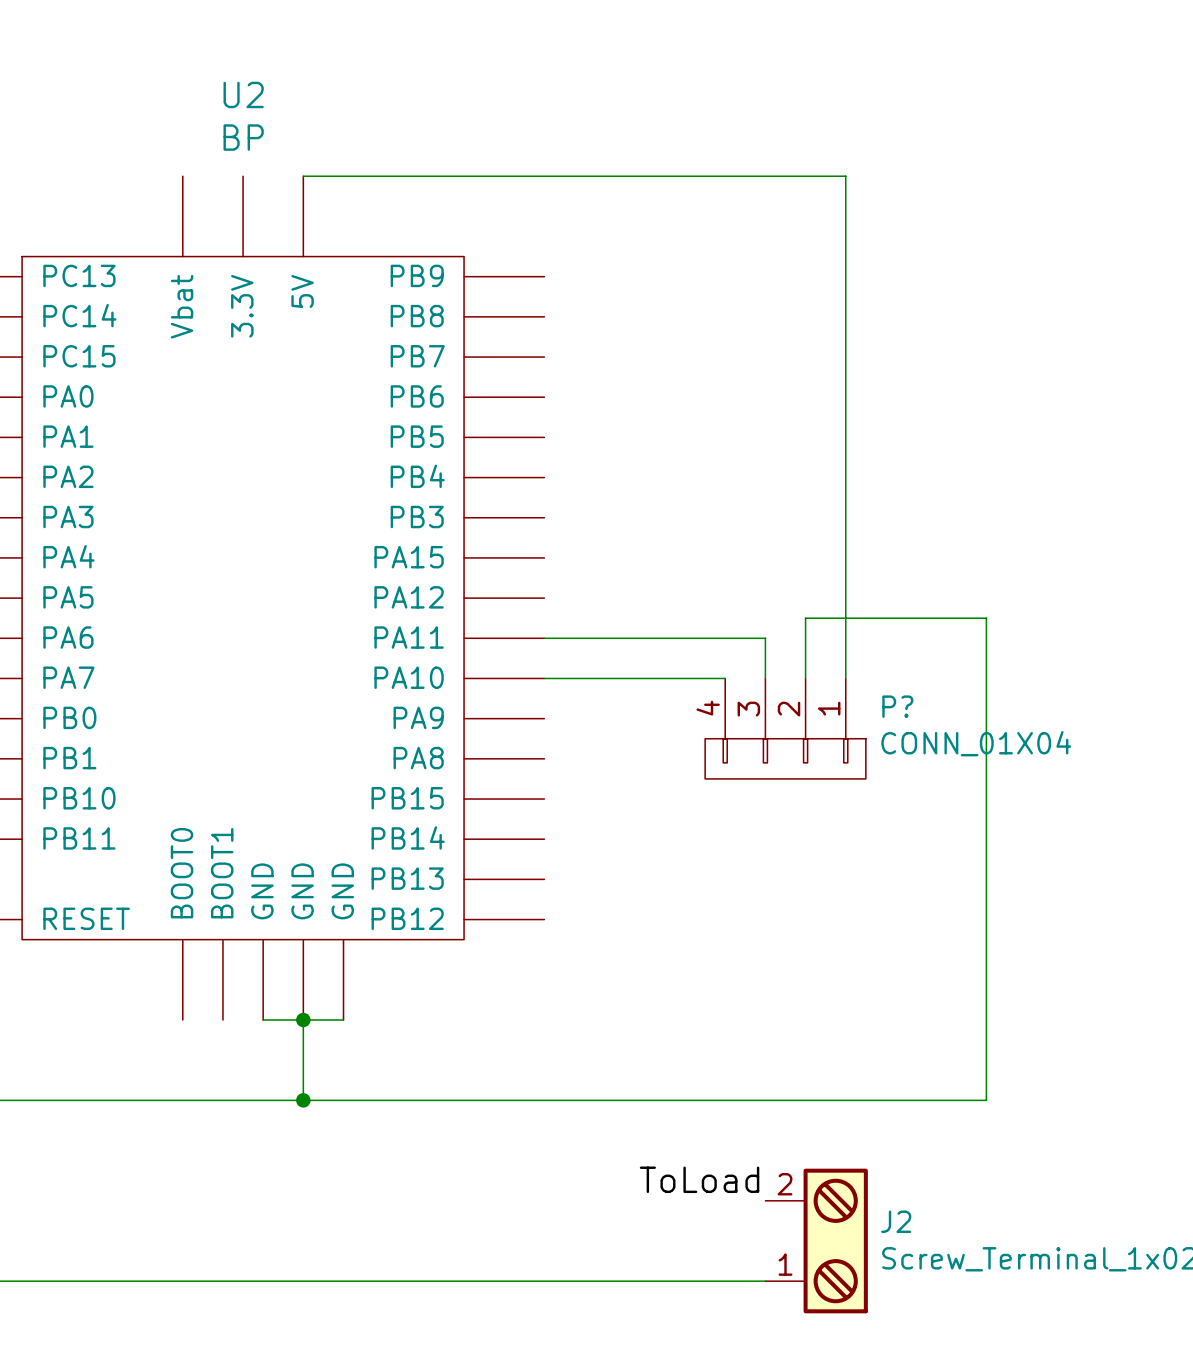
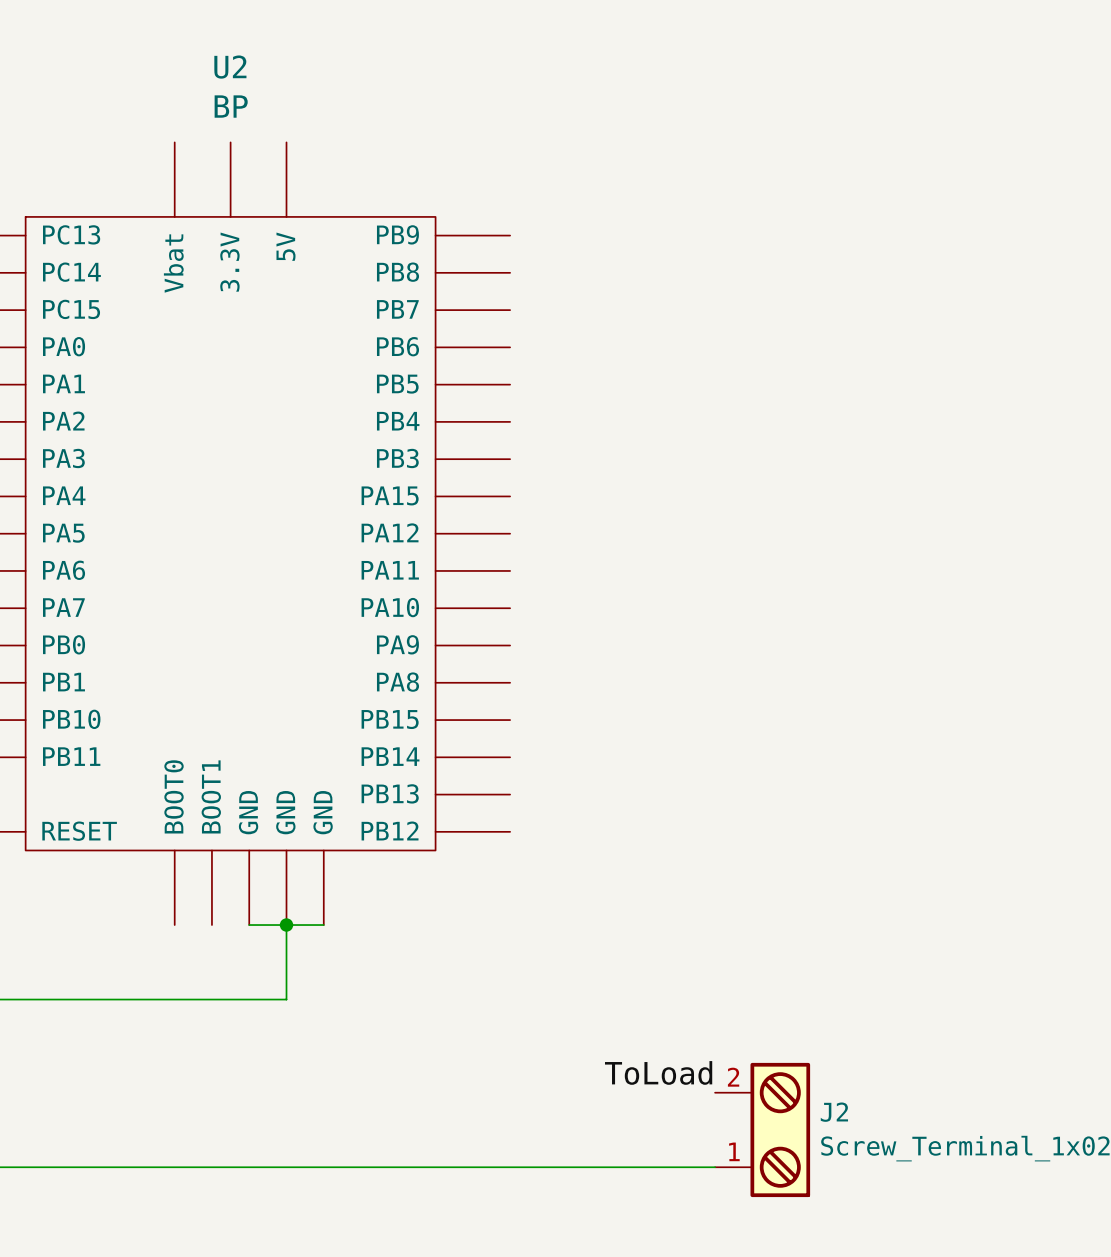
wire: (303, 176) (845, 176) (845, 678) -> none
wire: (544, 638) (765, 638) (765, 678) -> none
wire: (544, 678) (725, 678) -> none
wire: (805, 678) (805, 618) (986, 618) (986, 1100) (303, 1100) -> none
P?: CONN_01X04 (785, 728) -> none
junction: (303, 1100) -> none

